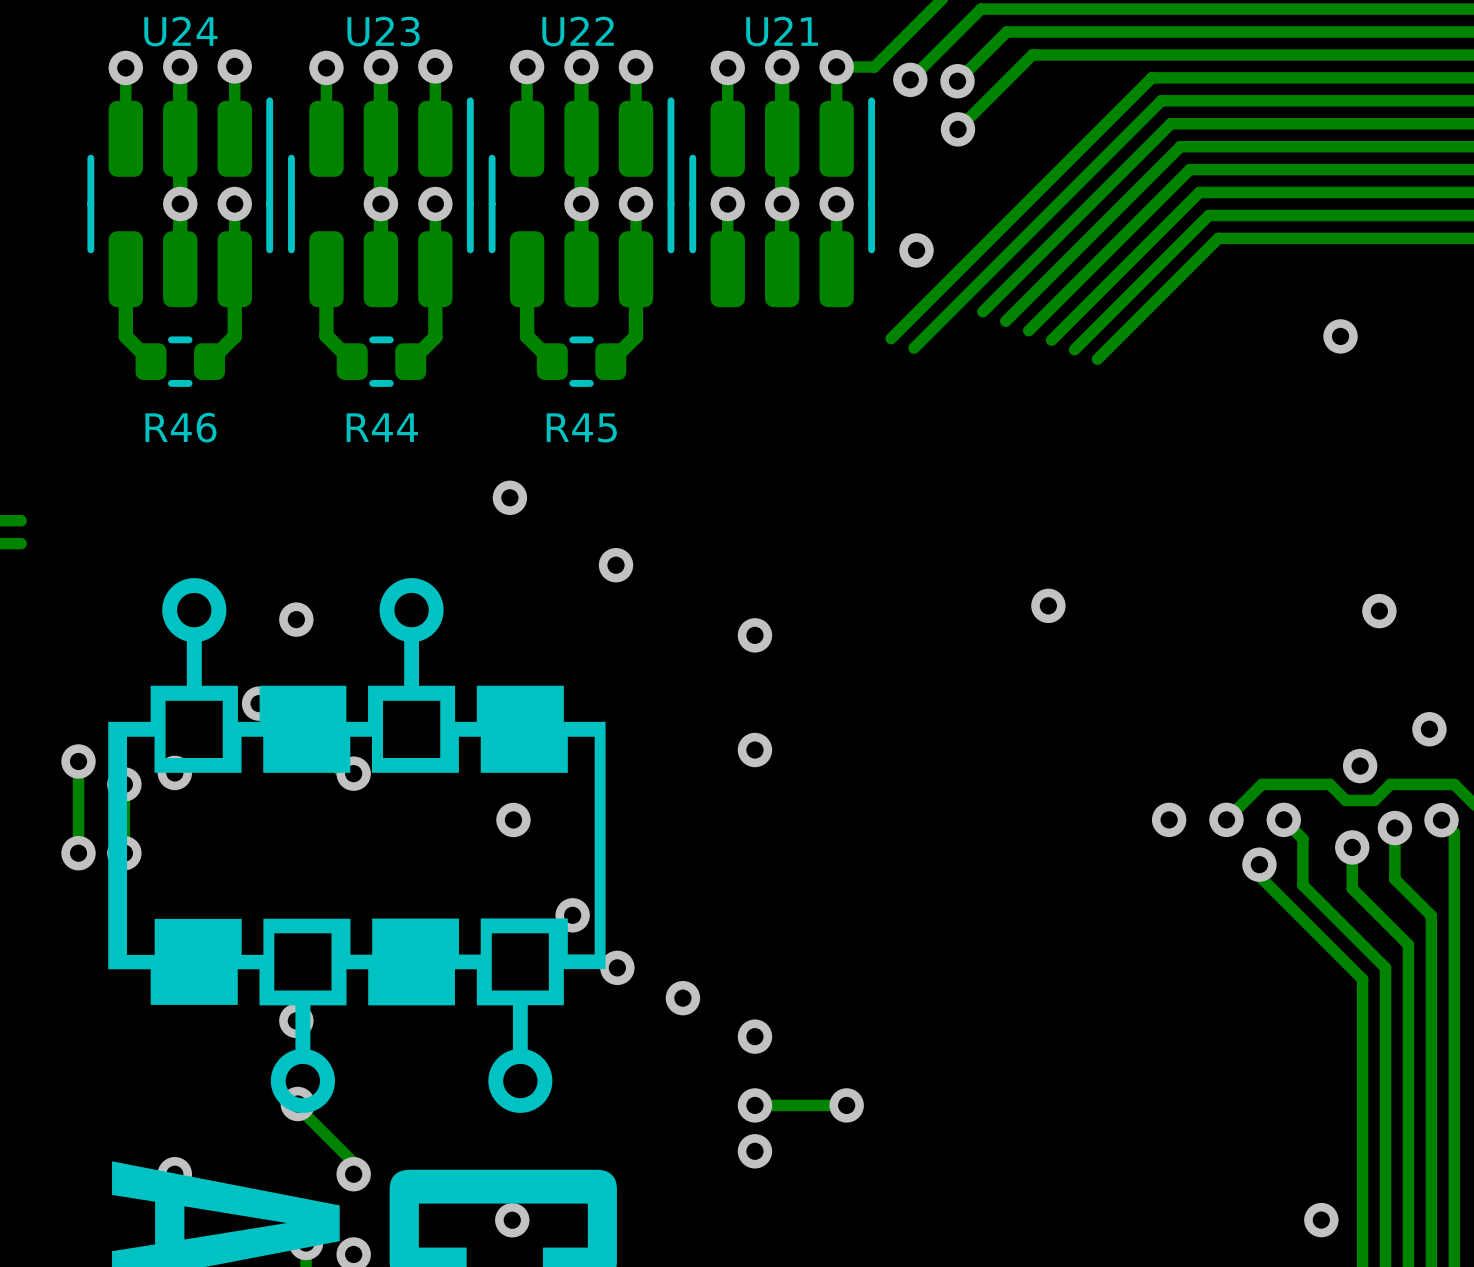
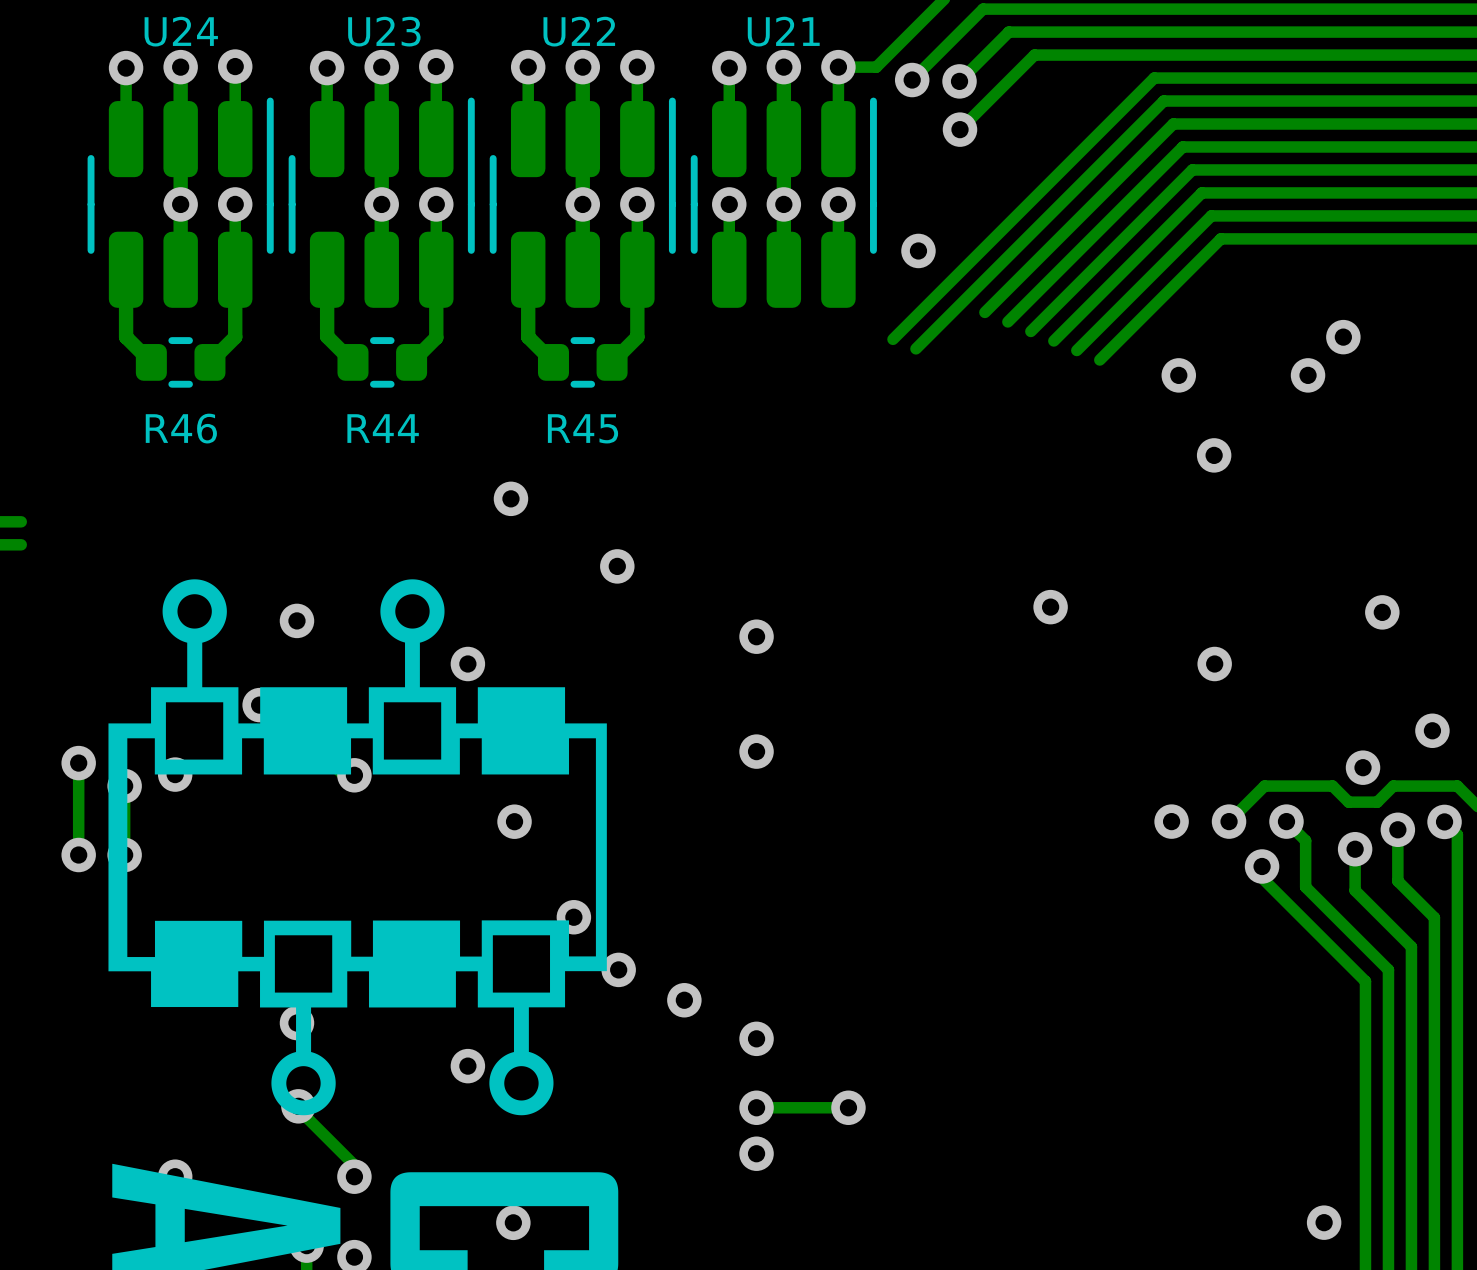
via: none -> (1178, 375)
via: none -> (1308, 375)
via: none -> (1214, 455)
via: none -> (467, 664)
via: none -> (1214, 664)
via: none -> (467, 1066)

